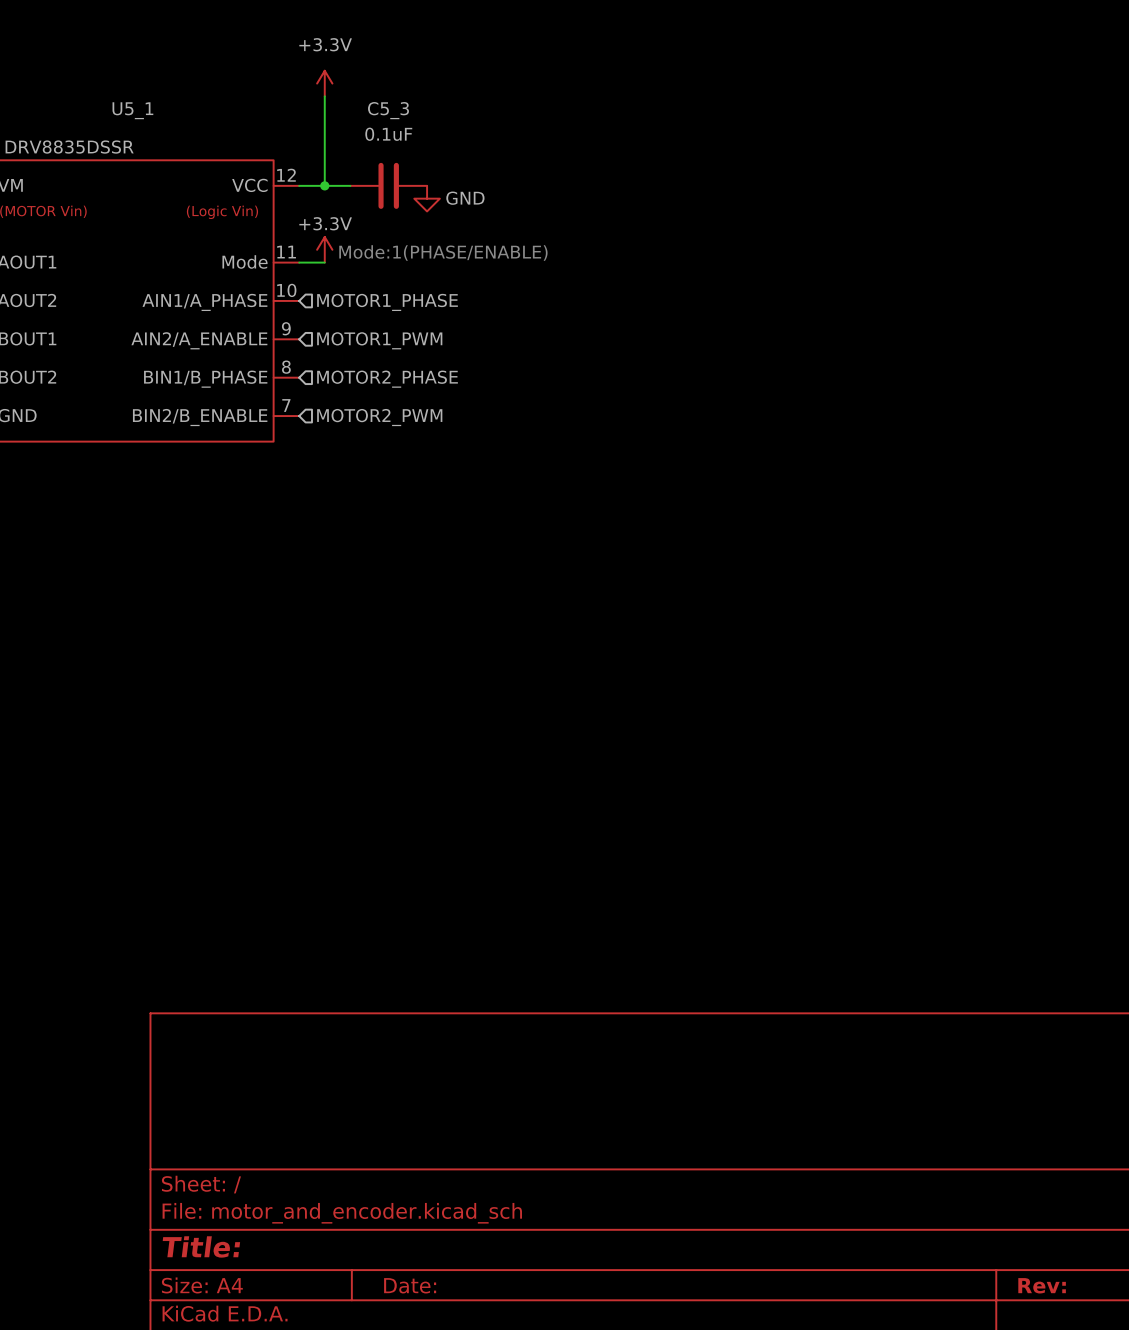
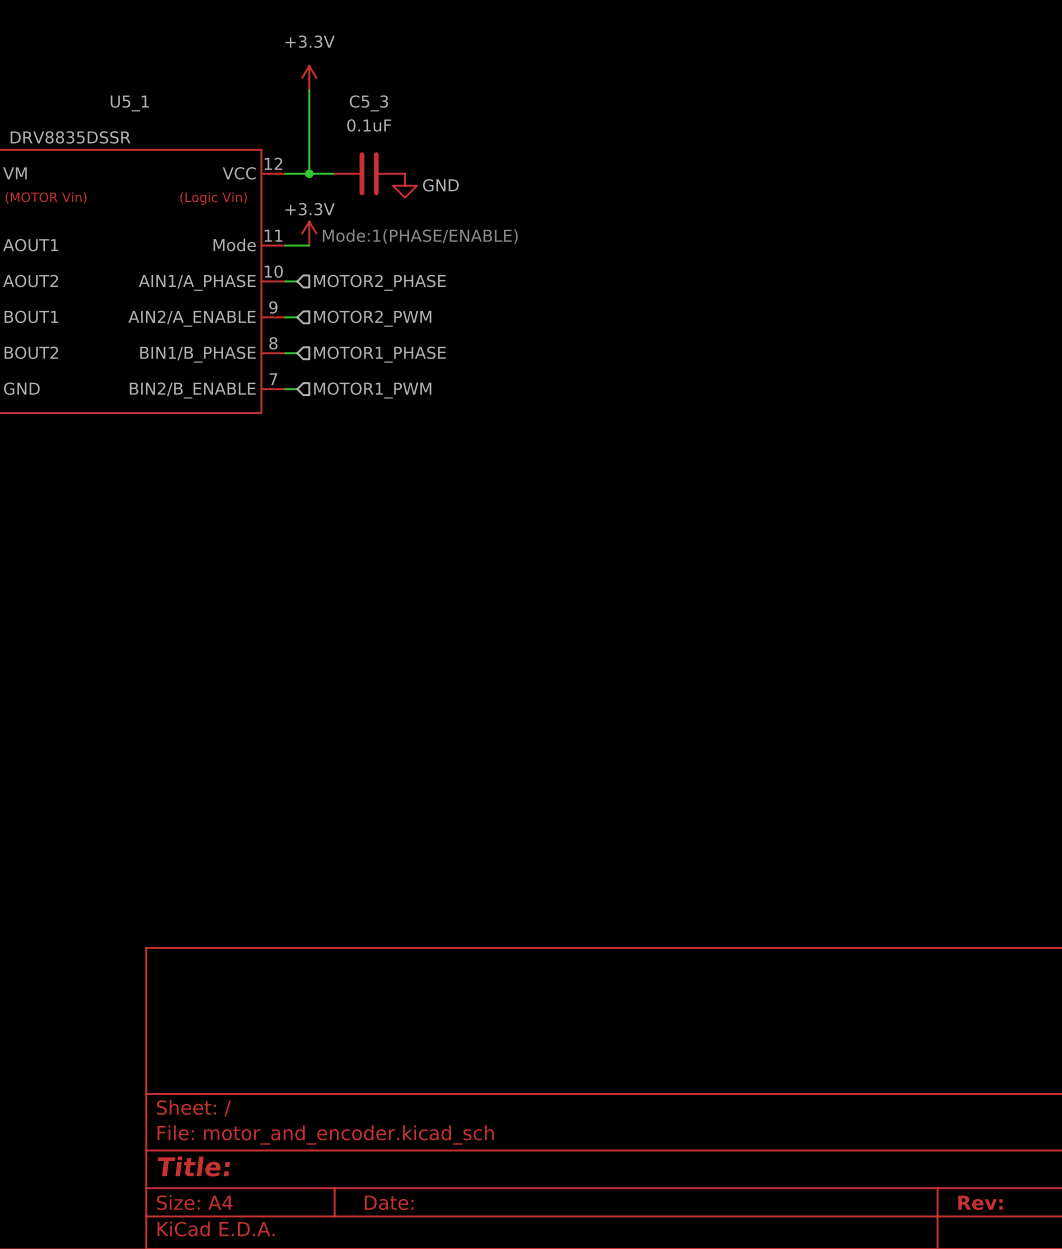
wire: none -> (285, 281) (297, 281)
hierarchical label position: MOTOR1_PHASE (387, 302) -> MOTOR1_PHASE (379, 354)
wire: none -> (285, 317) (297, 317)
hierarchical label position: MOTOR1_PWM (379, 340) -> MOTOR1_PWM (372, 390)
wire: none -> (285, 353) (297, 353)
hierarchical label position: MOTOR2_PHASE (387, 379) -> MOTOR2_PHASE (379, 282)
wire: none -> (285, 389) (297, 389)
hierarchical label position: MOTOR2_PWM (379, 417) -> MOTOR2_PWM (372, 318)

